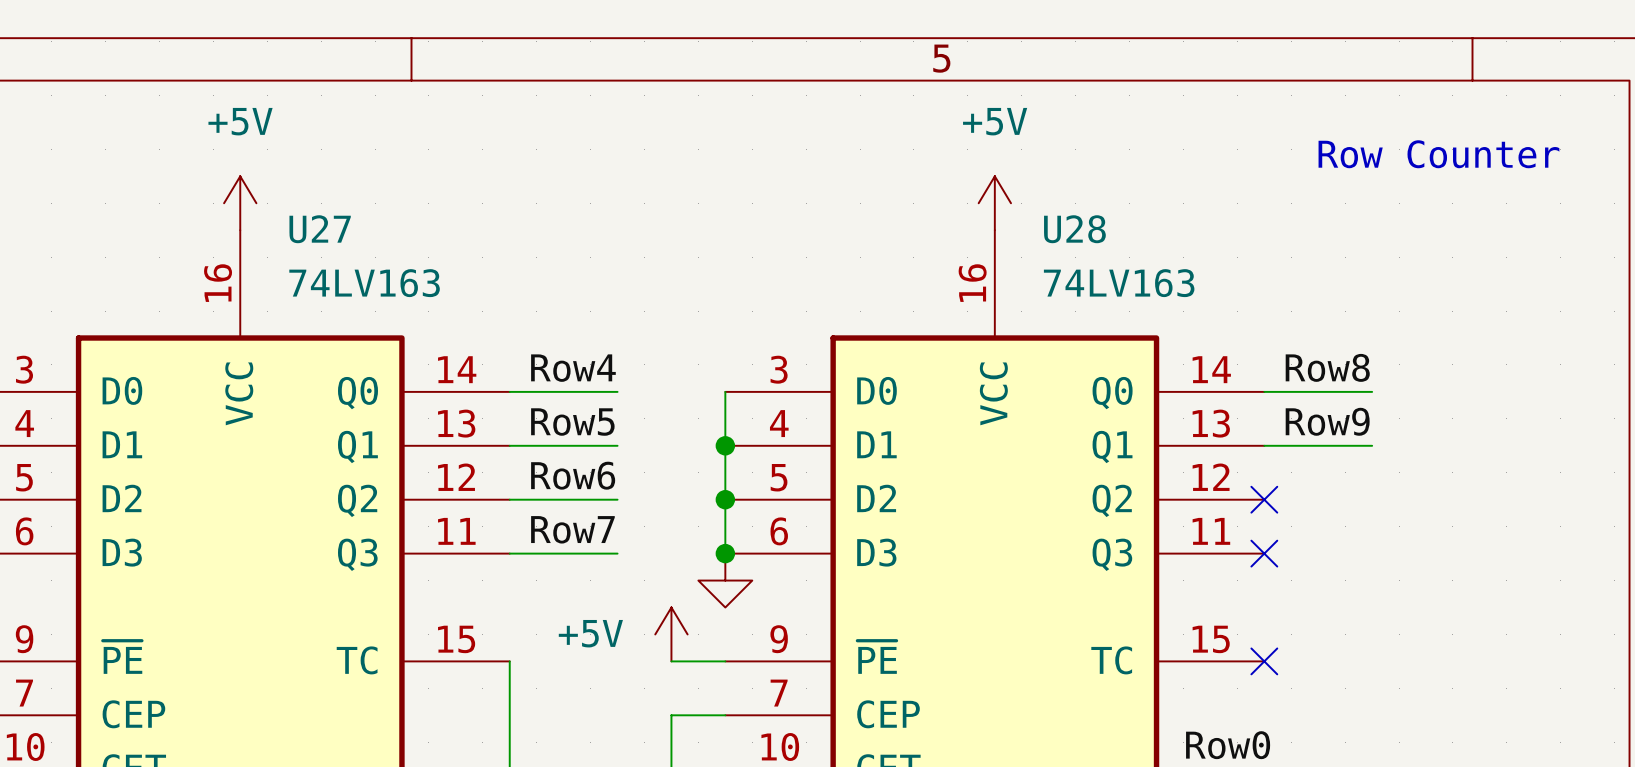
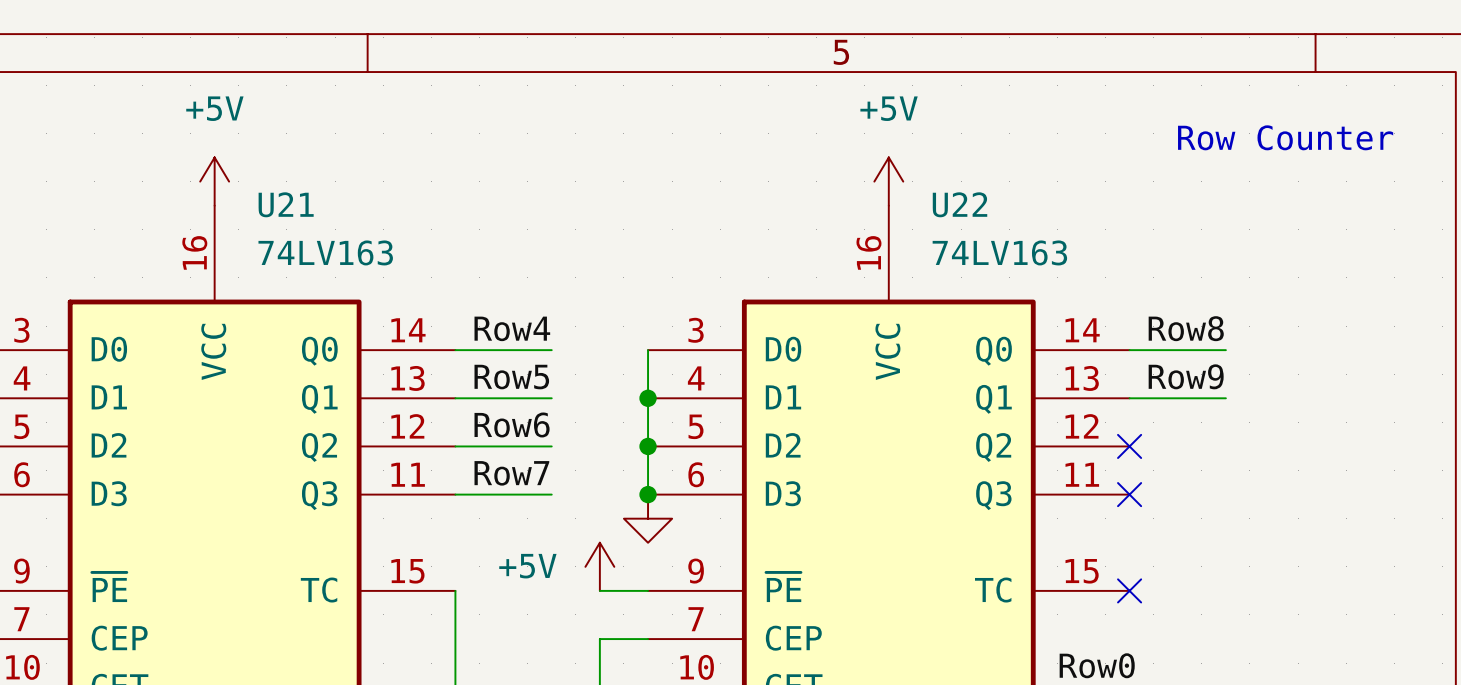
U27 name: U27 (320, 229) -> U21 (286, 204)
U28 name: U28 (1074, 229) -> U22 (960, 204)

